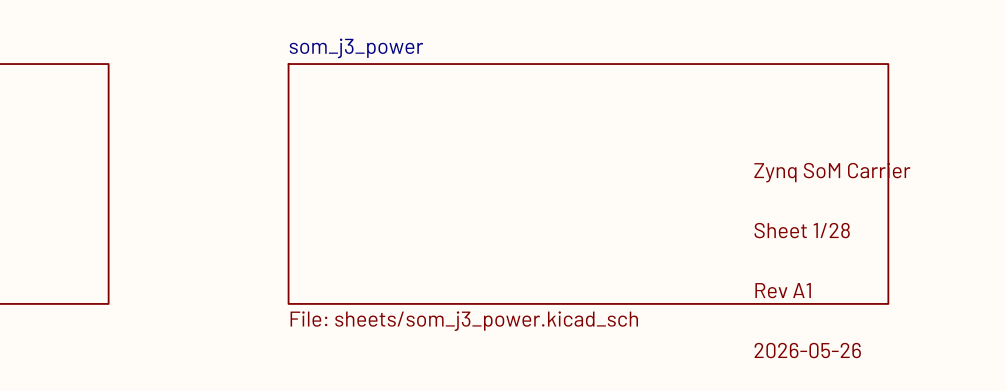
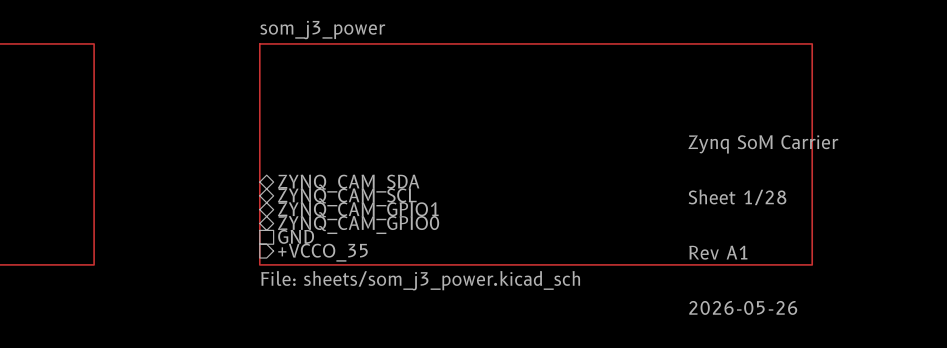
sheet pin: none -> ZYNQ_CAM_SDA (348, 183)
sheet pin: none -> ZYNQ_CAM_SCL (347, 197)
sheet pin: none -> ZYNQ_CAM_GPIO1 (358, 211)
sheet pin: none -> ZYNQ_CAM_GPIO0 (358, 225)
sheet pin: none -> GND (296, 236)
sheet pin: none -> +VCCO_35 (322, 252)

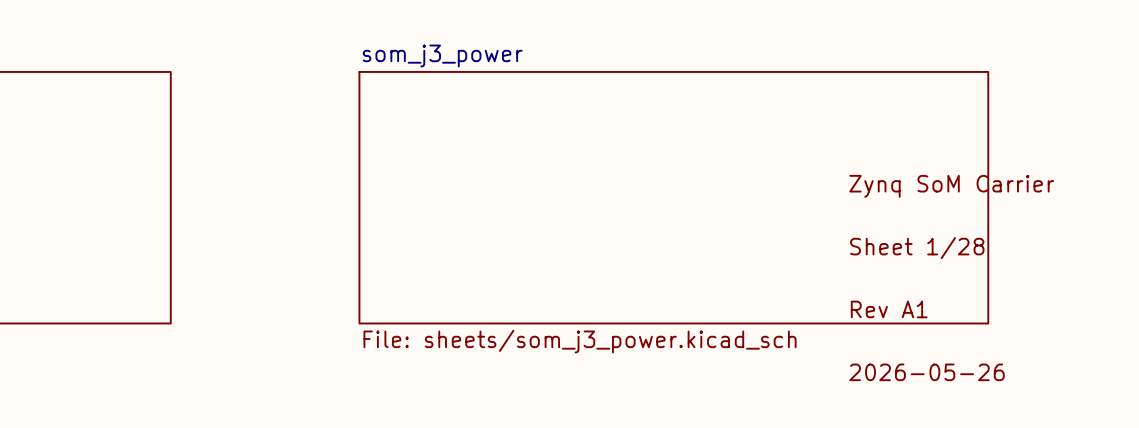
sheet pin: ZYNQ_CAM_SDA (348, 183) -> none
sheet pin: ZYNQ_CAM_SCL (347, 197) -> none
sheet pin: ZYNQ_CAM_GPIO1 (358, 211) -> none
sheet pin: ZYNQ_CAM_GPIO0 (358, 225) -> none
sheet pin: GND (296, 236) -> none
sheet pin: +VCCO_35 (322, 252) -> none

